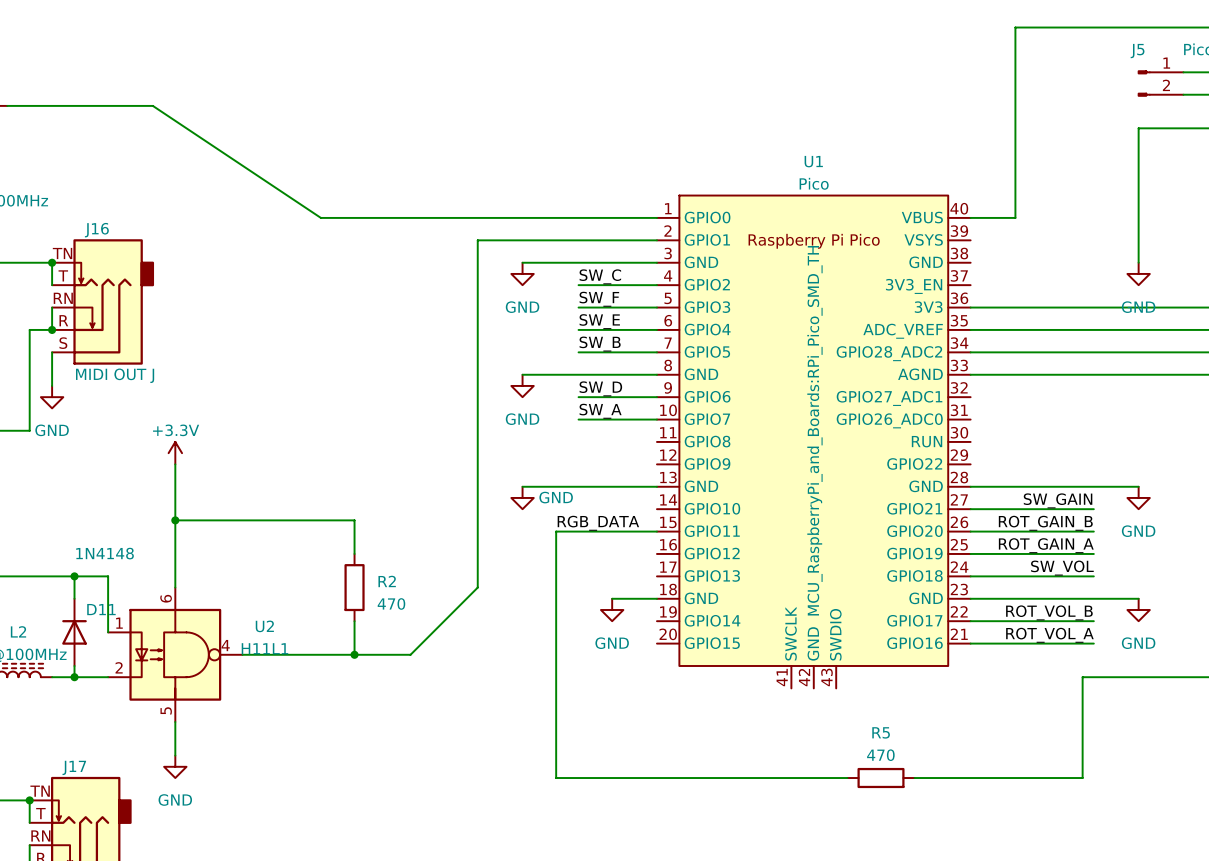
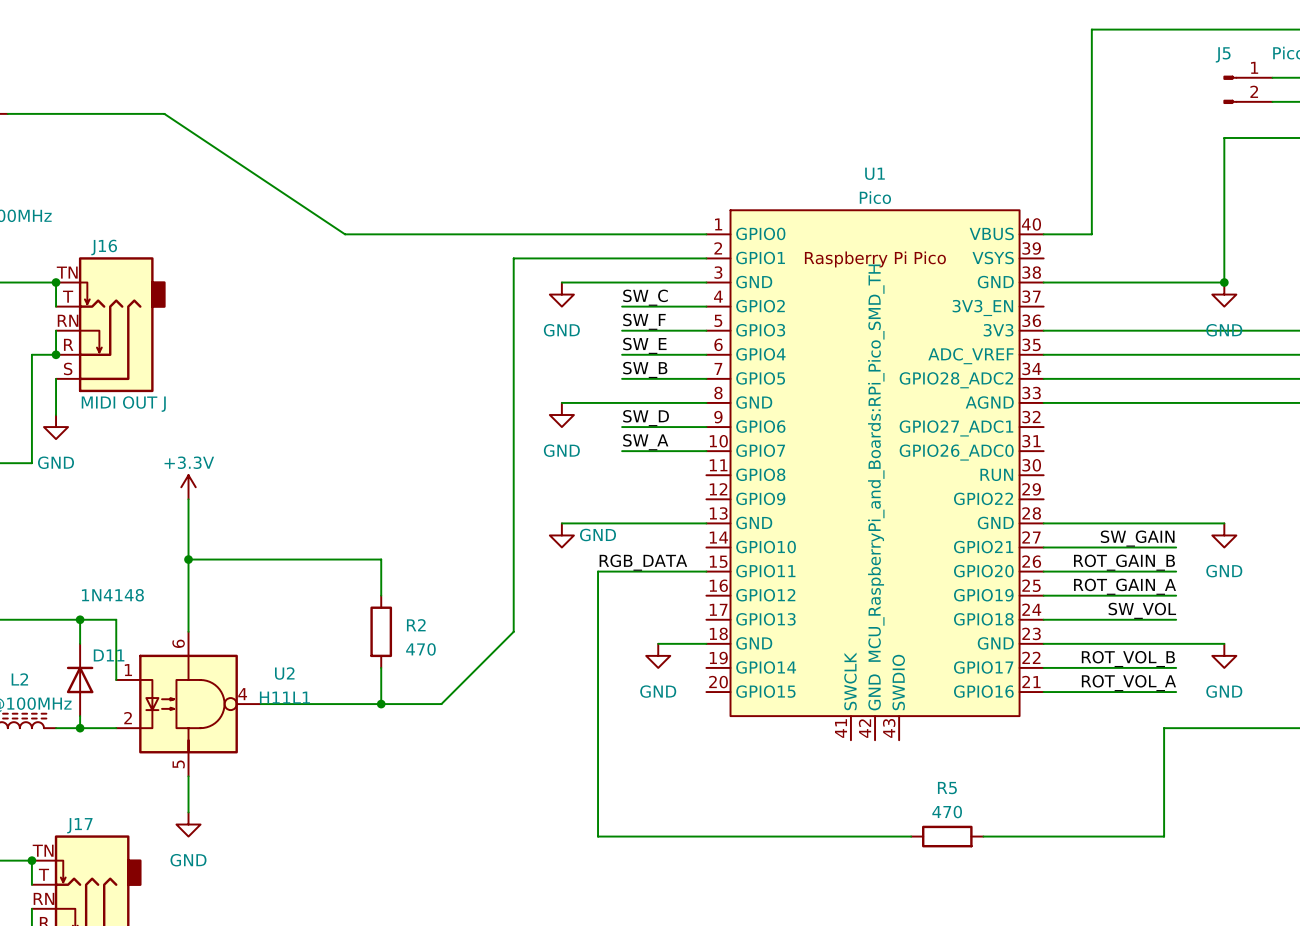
wire: none -> (1043, 282) (1224, 282)
junction: none -> (1224, 282)

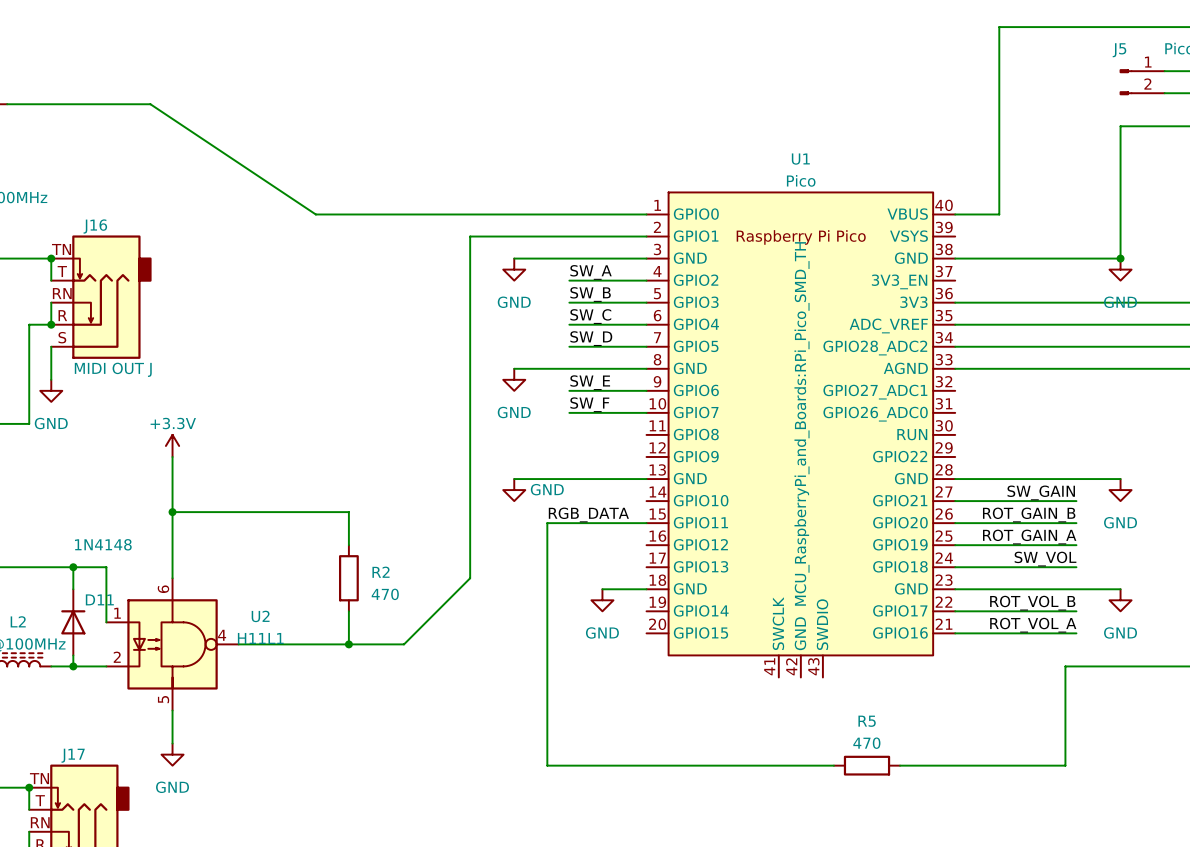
label: SW_C (645, 297) -> SW_A (591, 272)
label: SW_F (644, 321) -> SW_B (590, 294)
label: SW_E (644, 345) -> SW_C (590, 316)
label: SW_B (645, 369) -> SW_D (591, 338)
label: SW_D (646, 418) -> SW_E (590, 382)
label: SW_A (645, 442) -> SW_F (589, 404)

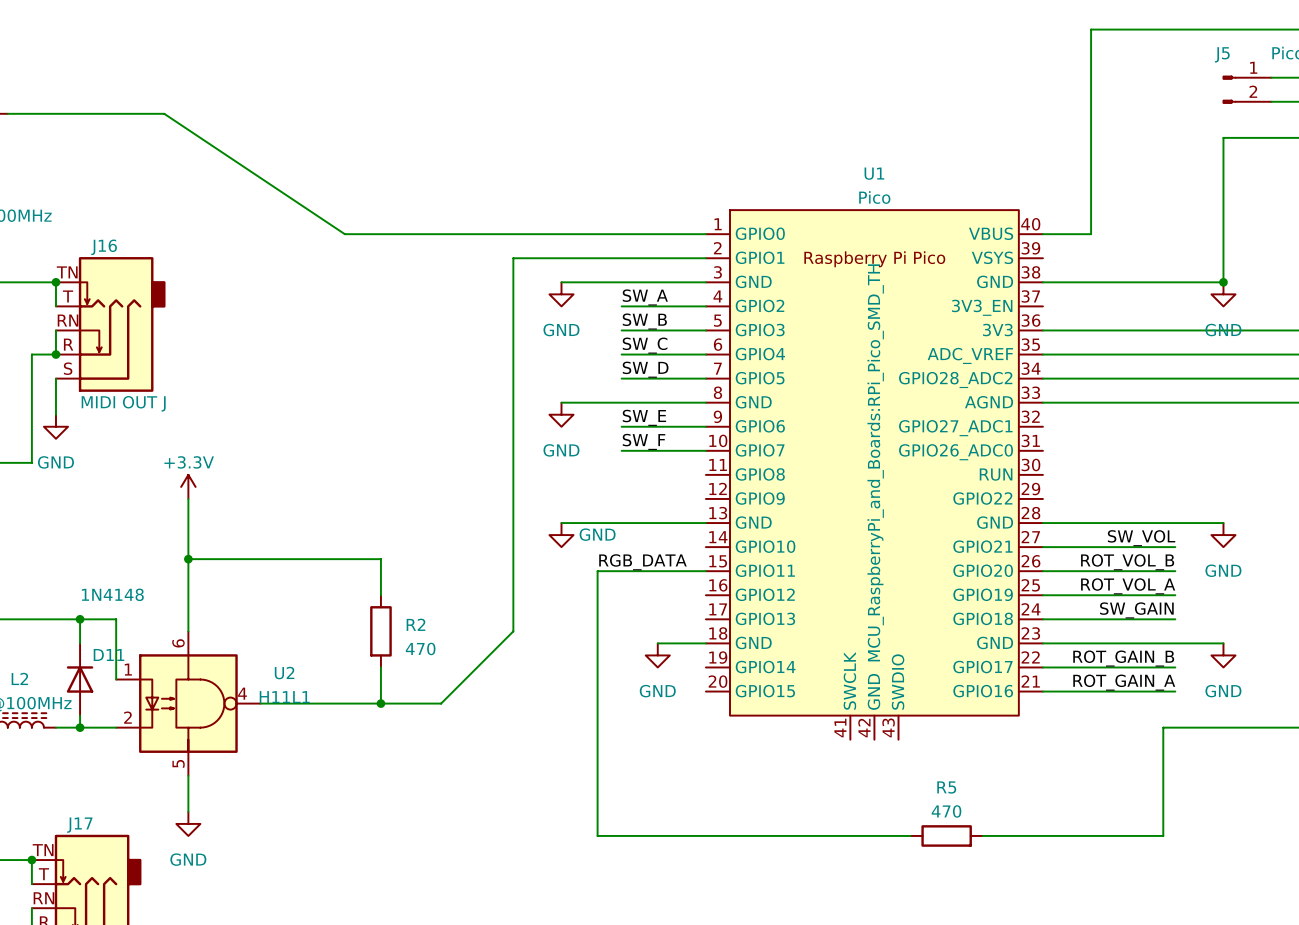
label: SW_GAIN (1041, 492) -> SW_VOL (1141, 538)
label: ROT_GAIN_B (1029, 514) -> ROT_VOL_B (1127, 562)
label: ROT_GAIN_A (1029, 537) -> ROT_VOL_A (1128, 586)
label: SW_VOL (1045, 559) -> SW_GAIN (1136, 610)
label: ROT_VOL_B (1032, 603) -> ROT_GAIN_B (1123, 658)
label: ROT_VOL_A (1033, 625) -> ROT_GAIN_A (1124, 682)

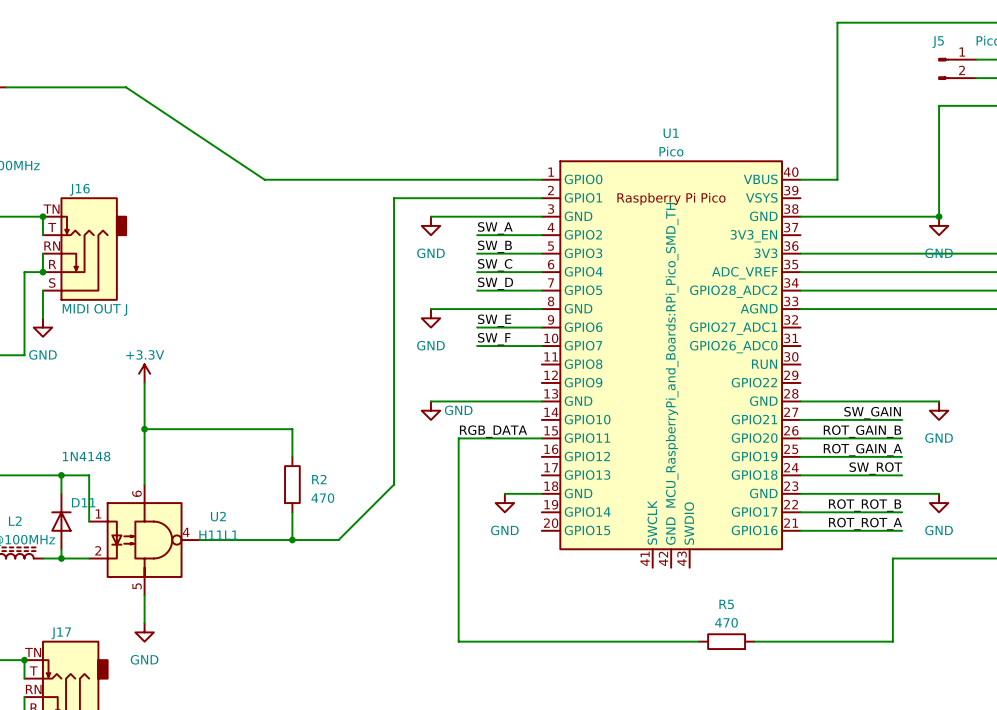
label: SW_VOL (1141, 538) -> SW_GAIN (872, 413)
label: ROT_VOL_B (1127, 562) -> ROT_GAIN_B (862, 431)
label: ROT_VOL_A (1128, 586) -> ROT_GAIN_A (862, 450)
label: SW_GAIN (1136, 610) -> SW_ROT (875, 468)
label: ROT_GAIN_B (1123, 658) -> ROT_ROT_B (865, 505)
label: ROT_GAIN_A (1124, 682) -> ROT_ROT_A (865, 523)

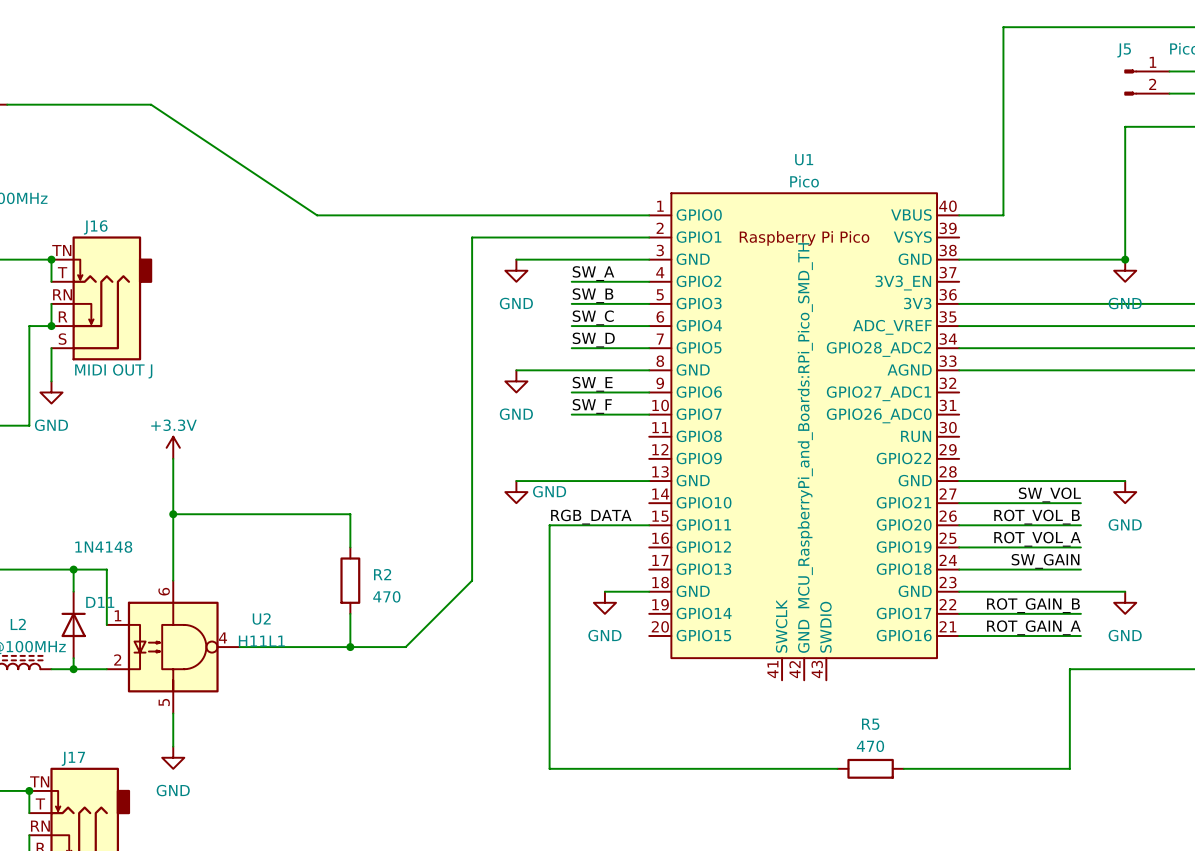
label: SW_GAIN (872, 413) -> SW_VOL (1049, 494)
label: ROT_GAIN_B (862, 431) -> ROT_VOL_B (1037, 517)
label: ROT_GAIN_A (862, 450) -> ROT_VOL_A (1037, 539)
label: SW_ROT (875, 468) -> SW_GAIN (1045, 561)
label: ROT_ROT_B (865, 505) -> ROT_GAIN_B (1033, 605)
label: ROT_ROT_A (865, 523) -> ROT_GAIN_A (1033, 627)

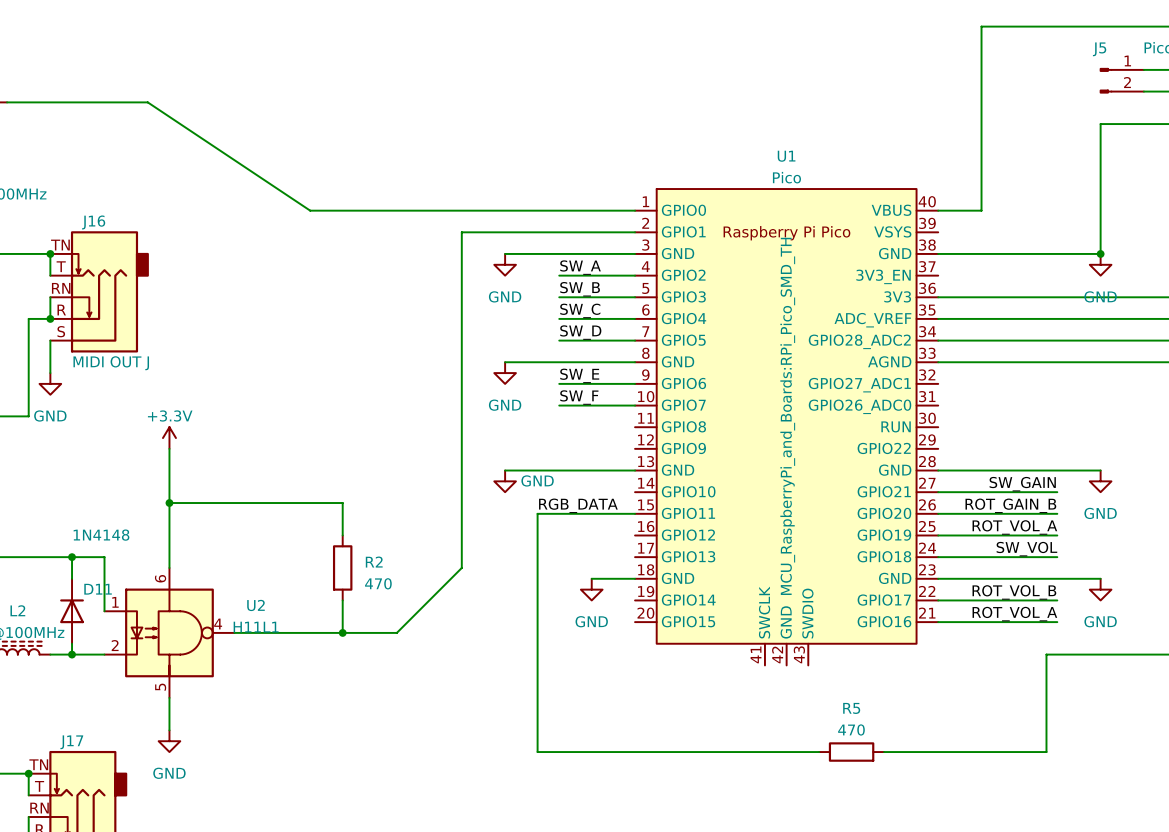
label: SW_VOL (1049, 494) -> SW_GAIN (1022, 484)
label: ROT_VOL_B (1037, 517) -> ROT_GAIN_B (1010, 505)
label: SW_GAIN (1045, 561) -> SW_VOL (1026, 549)
label: ROT_GAIN_B (1033, 605) -> ROT_VOL_B (1014, 592)
label: ROT_GAIN_A (1033, 627) -> ROT_VOL_A (1014, 614)

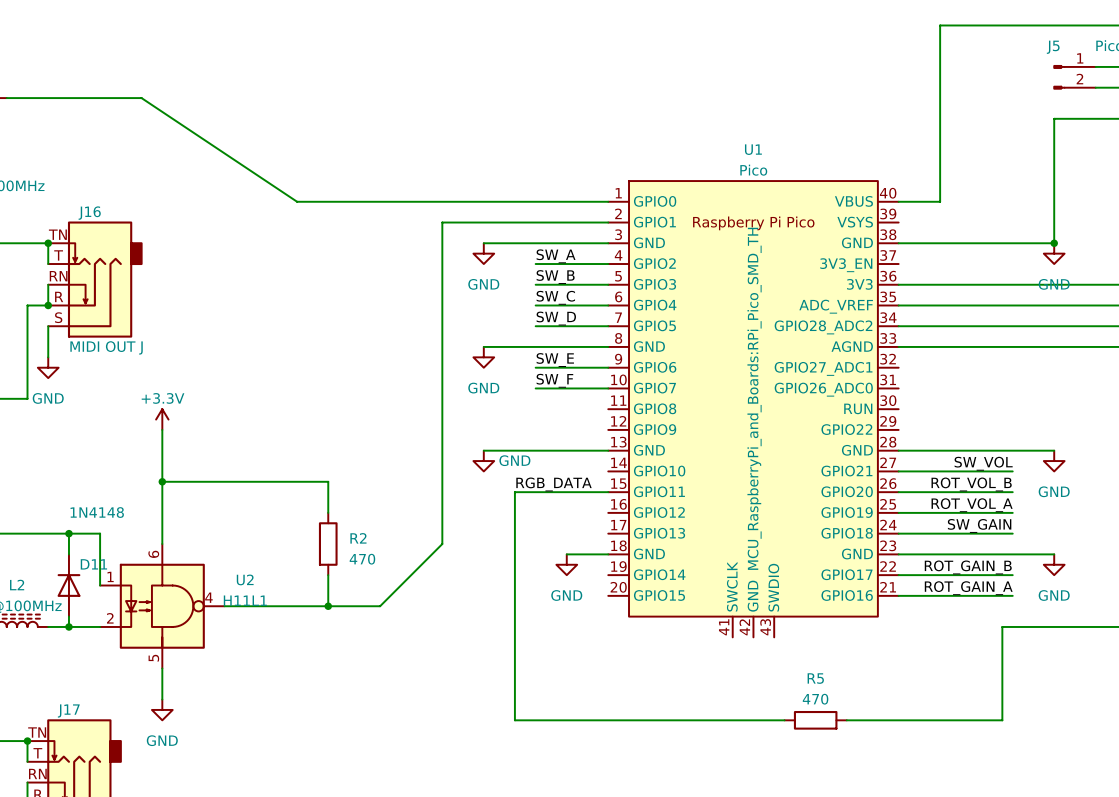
label: SW_GAIN (1022, 484) -> SW_VOL (983, 463)
label: ROT_GAIN_B (1010, 505) -> ROT_VOL_B (971, 484)
label: SW_VOL (1026, 549) -> SW_GAIN (979, 525)
label: ROT_VOL_B (1014, 592) -> ROT_GAIN_B (968, 567)
label: ROT_VOL_A (1014, 614) -> ROT_GAIN_A (968, 588)

